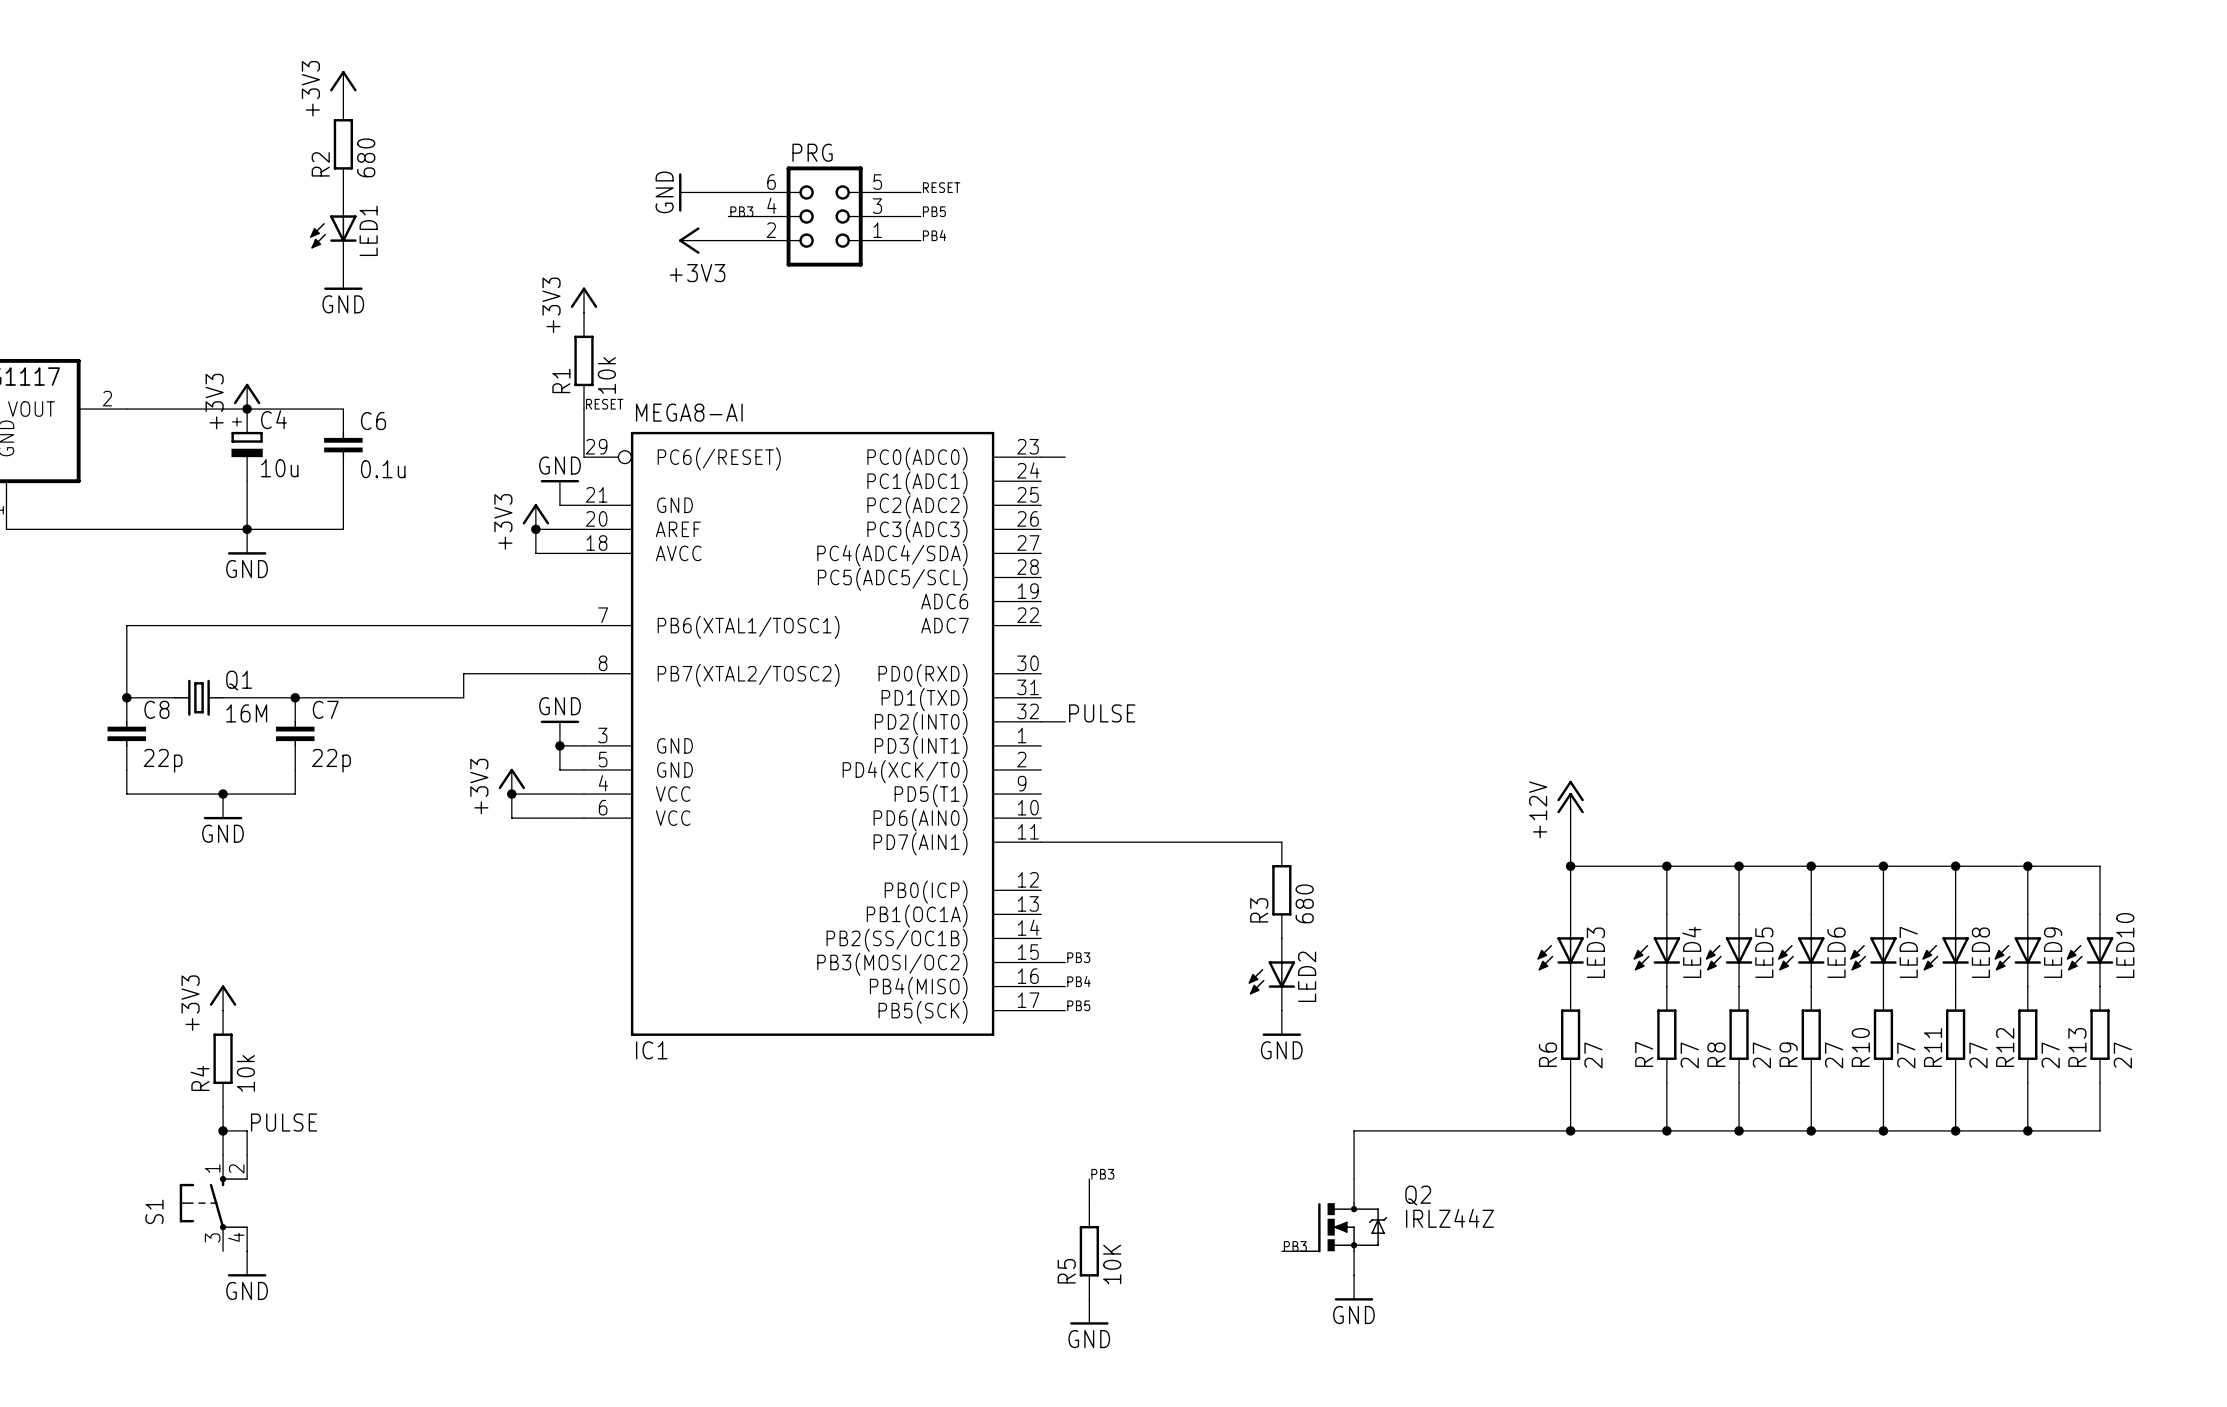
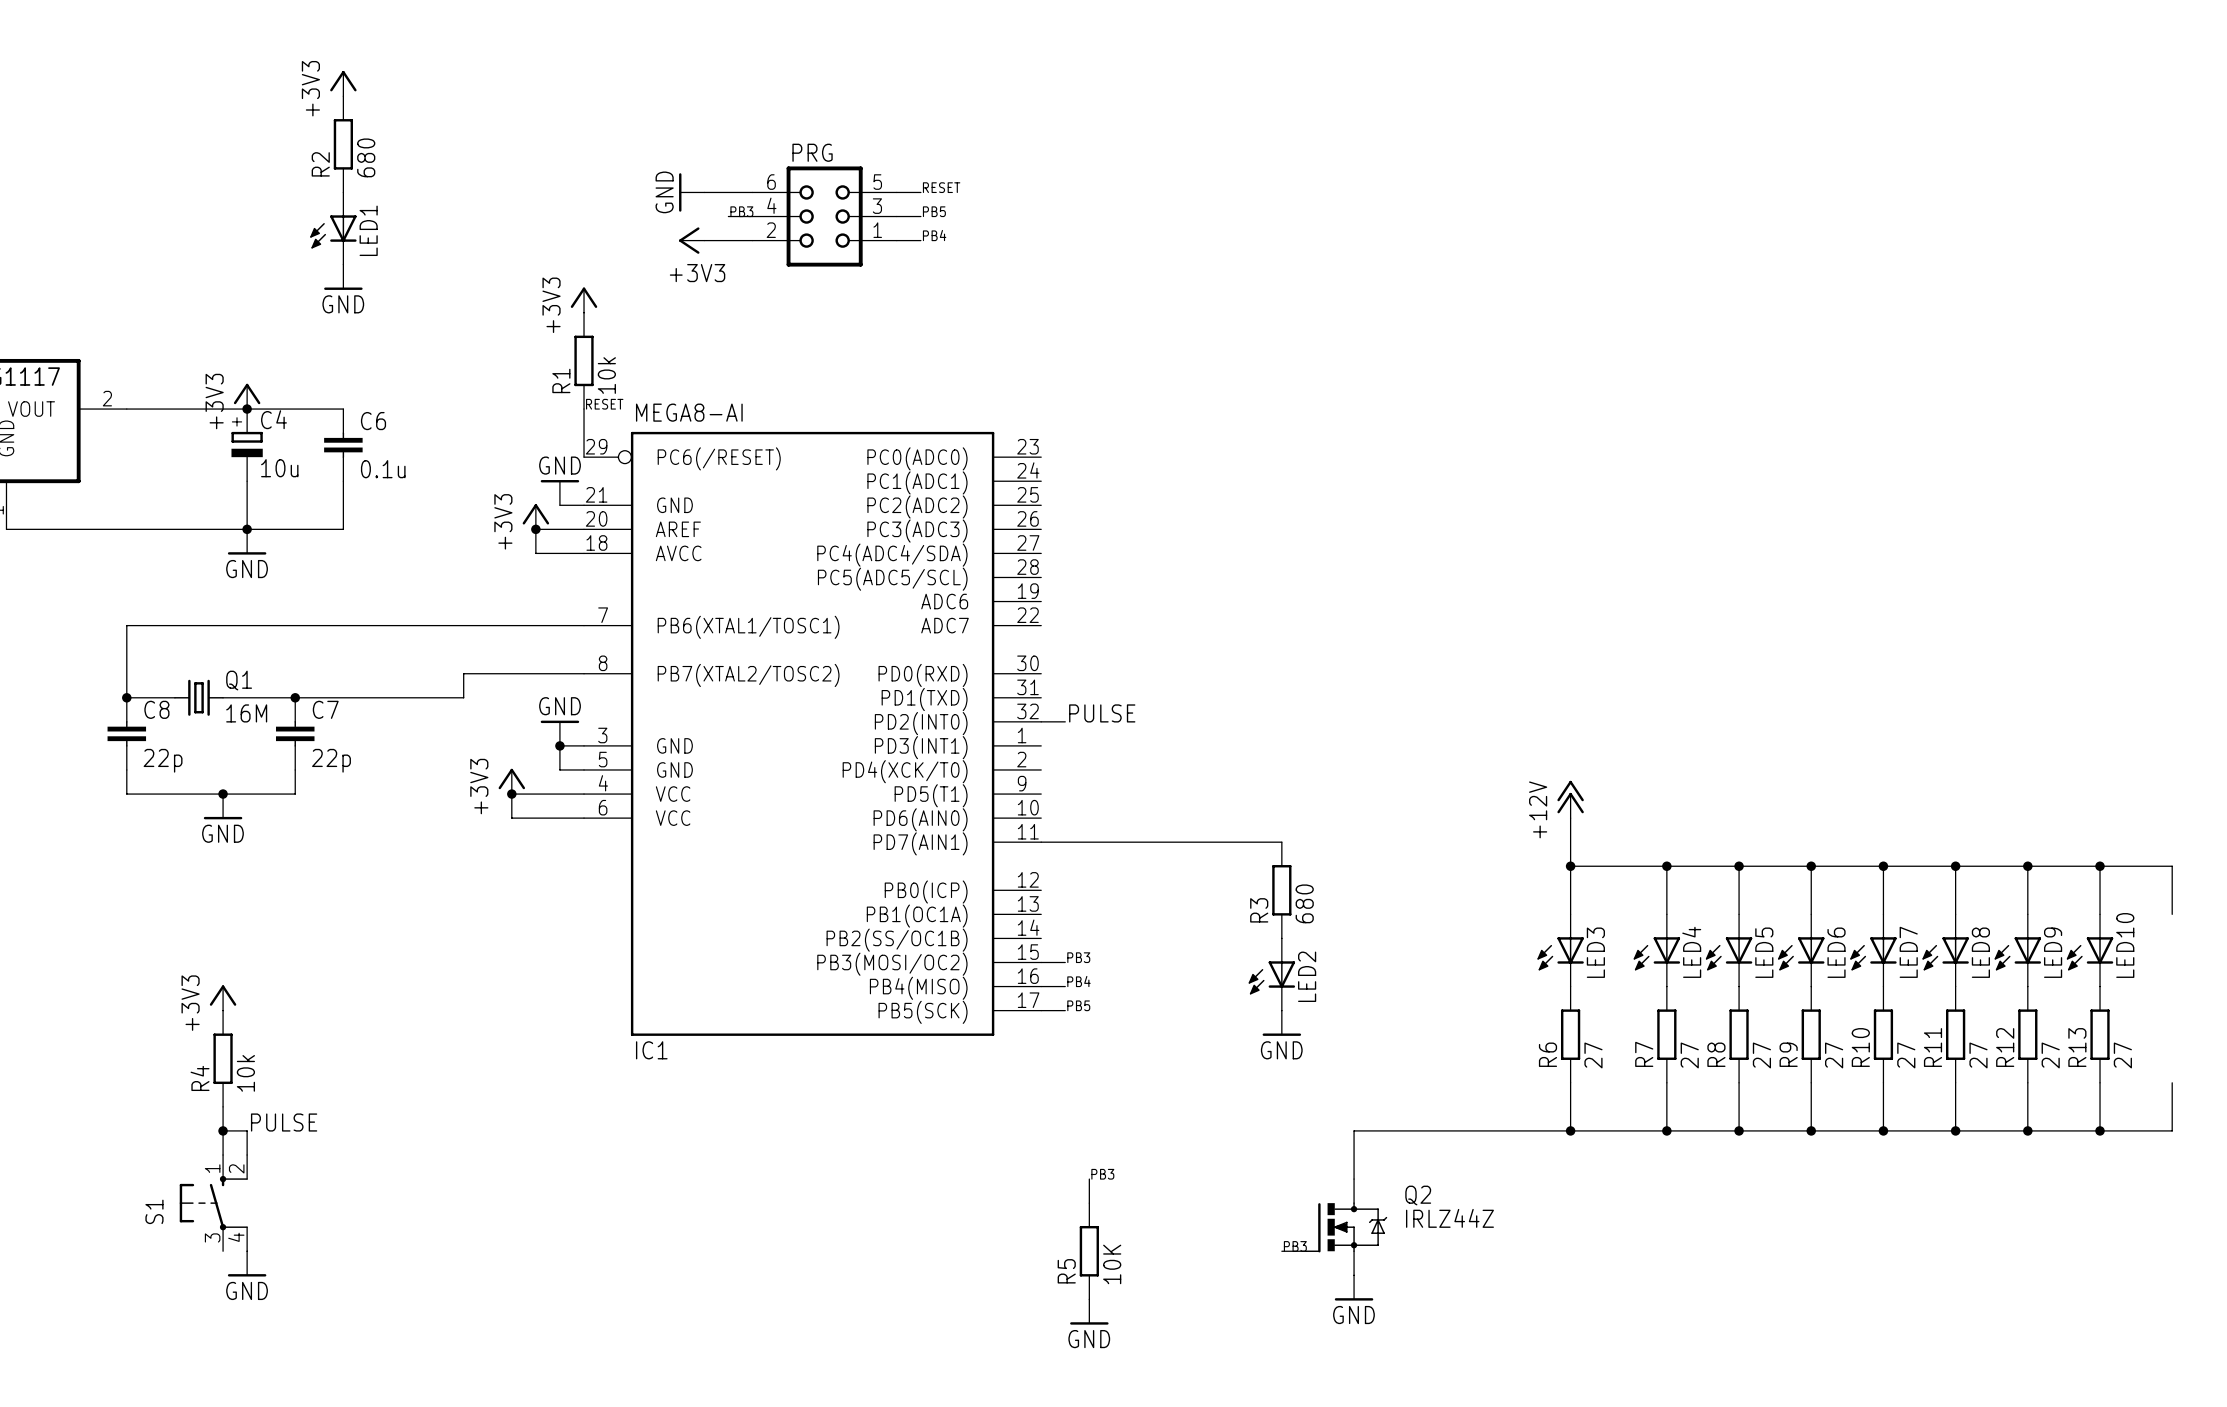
wire: (1041, 457) (1065, 457) -> none
wire: none -> (2100, 866) (2172, 866) (2172, 914)
junction: none -> (2100, 866)
wire: none -> (2172, 1082) (2172, 1130) (2100, 1130)
junction: none -> (2100, 1130)

